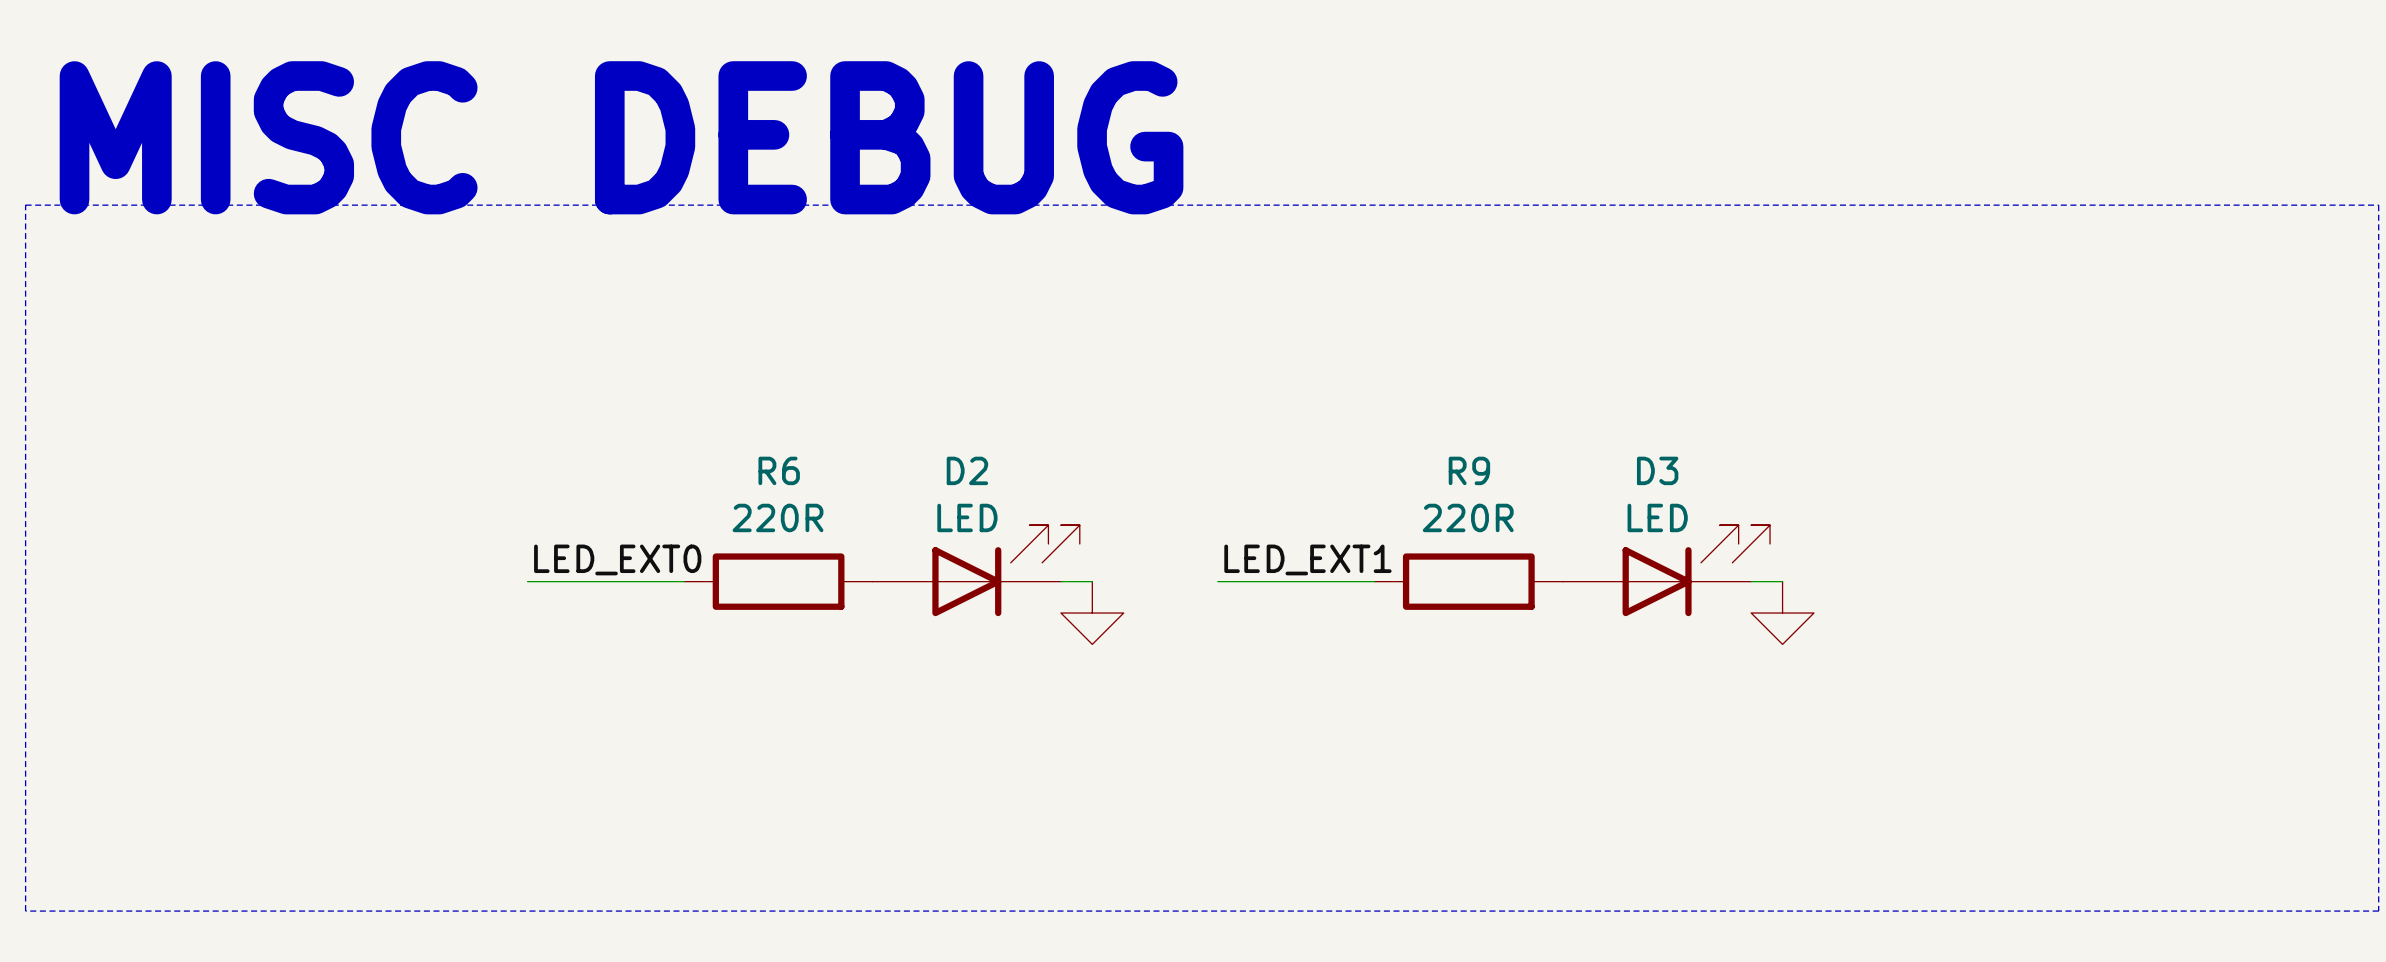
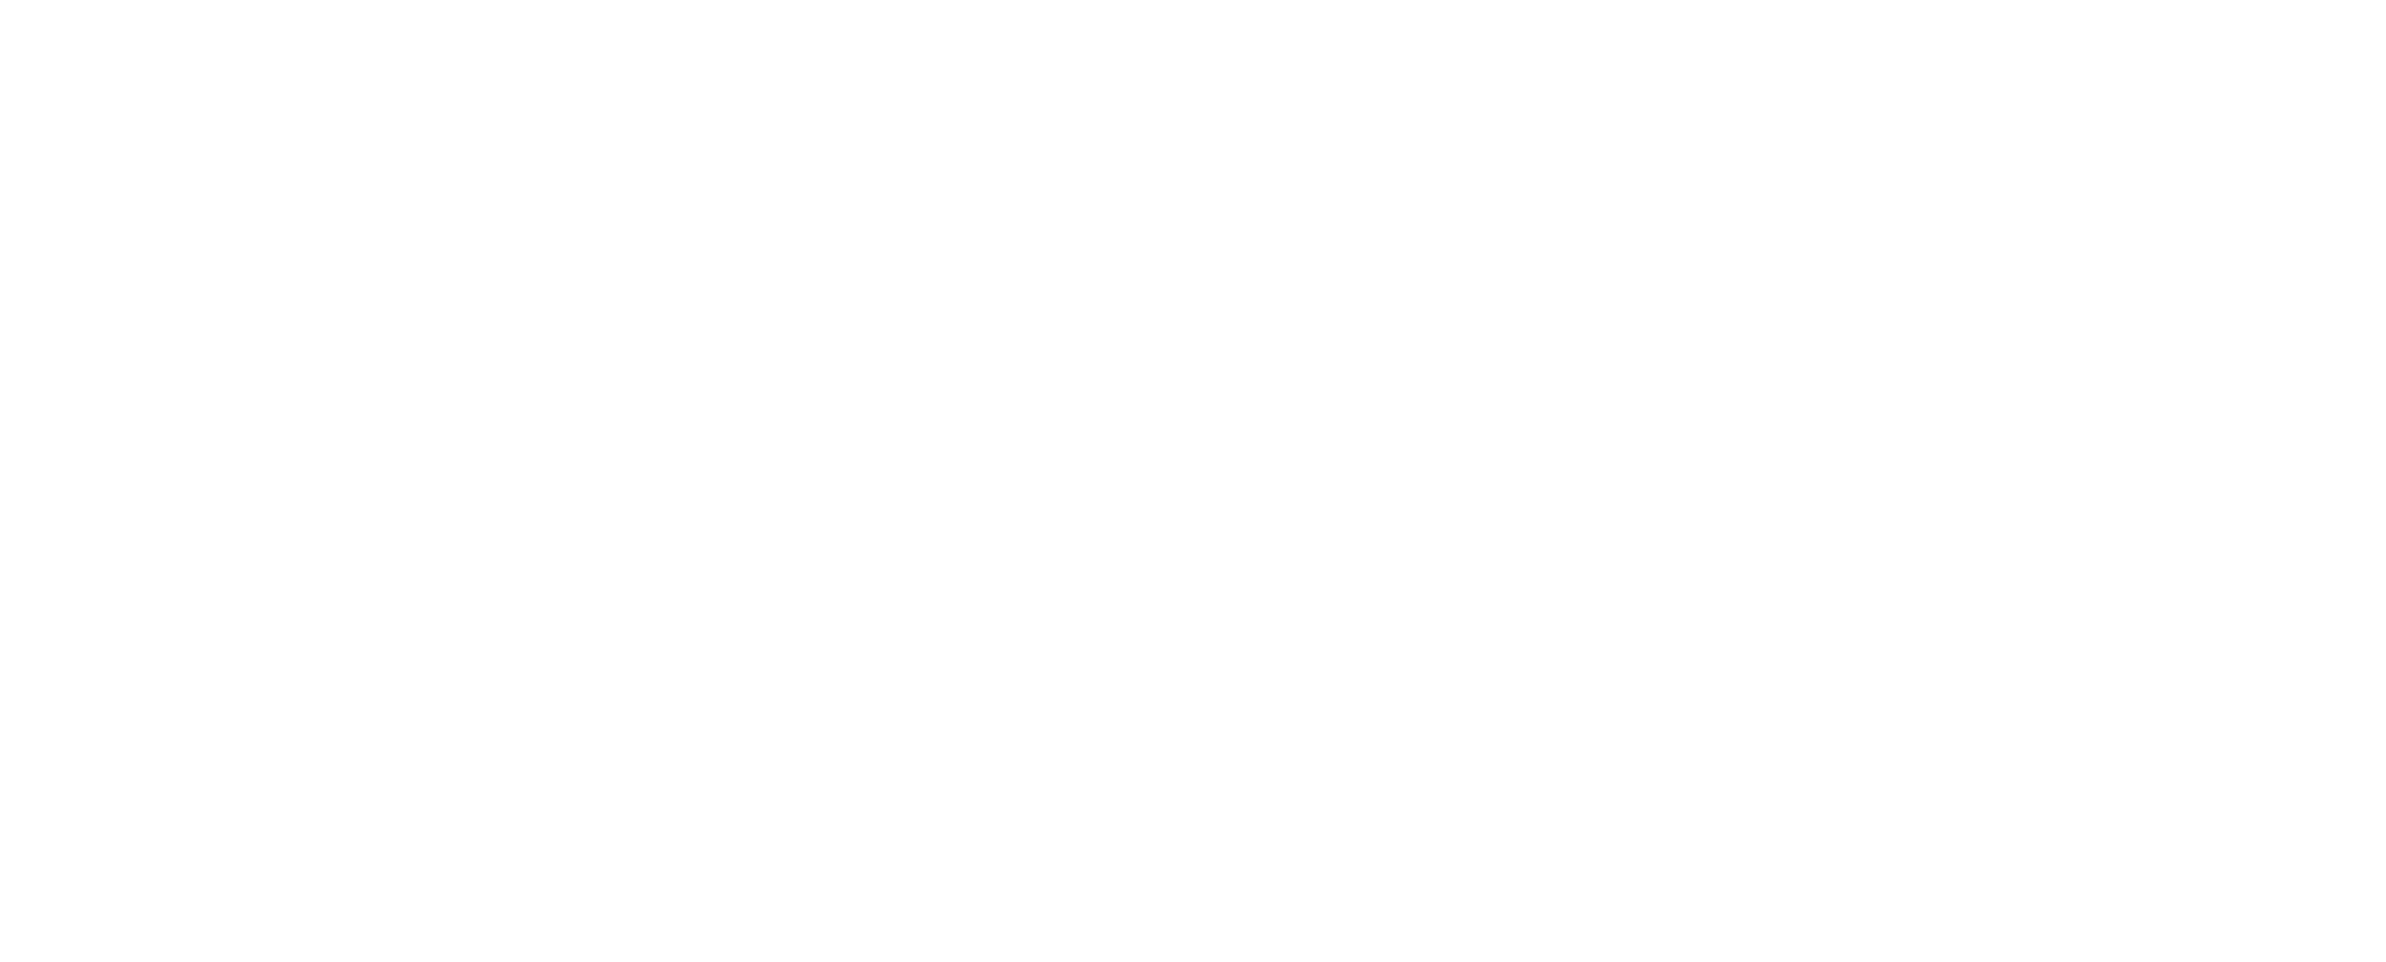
text: MISC DEBUG (621, 137) -> none
line: (25, 205) (2378, 205) (2378, 911) (25, 911) (25, 205) -> none
label: LED_EXT0 (617, 559) -> none
label: LED_EXT1 (1307, 559) -> none
D2: LED (976, 570) -> none
D3: LED (1666, 570) -> none
wire: (527, 581) (684, 581) -> none
R6: 220R (778, 581) -> none
wire: (1060, 581) (1092, 581) -> none
wire: (1217, 581) (1374, 581) -> none
R9: 220R (1468, 581) -> none
wire: (1751, 581) (1782, 581) -> none
power symbol: (1092, 613) -> none
power symbol: (1782, 613) -> none

